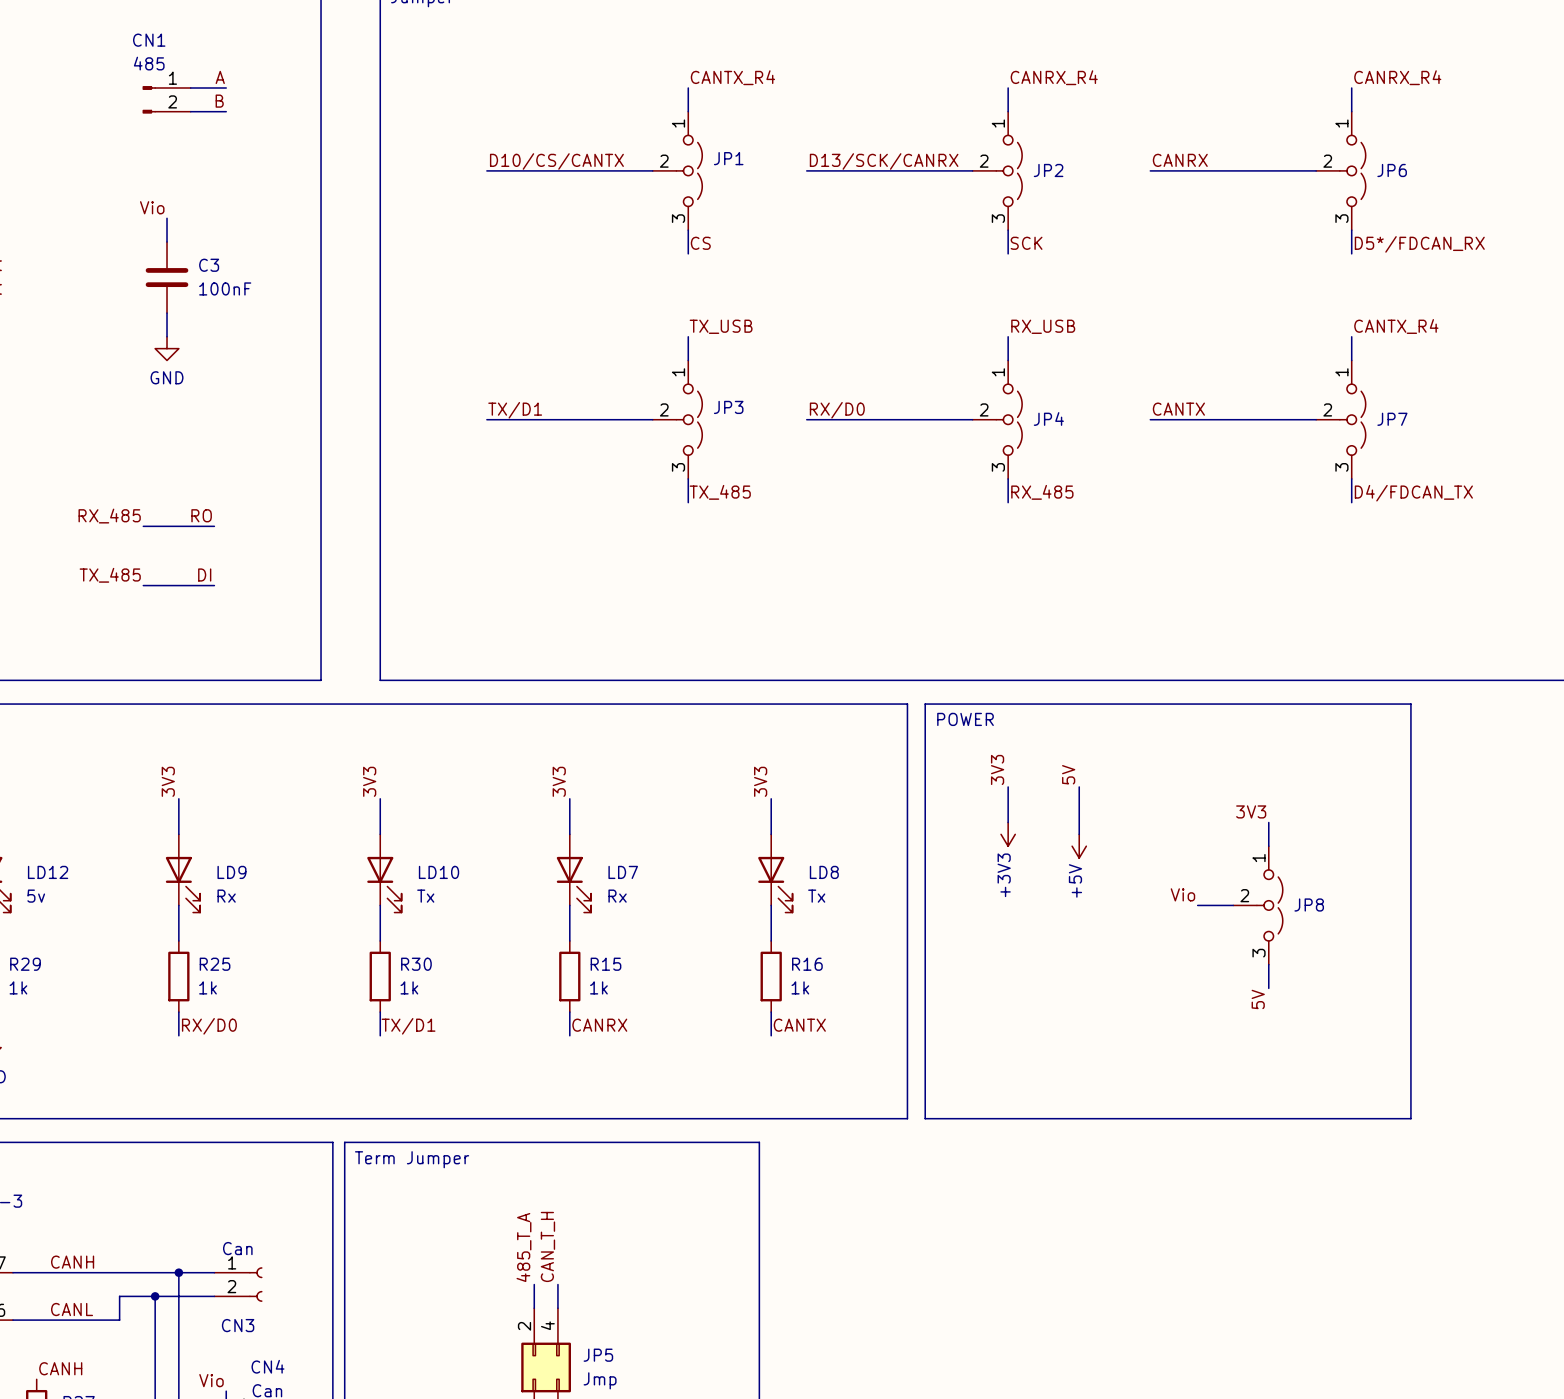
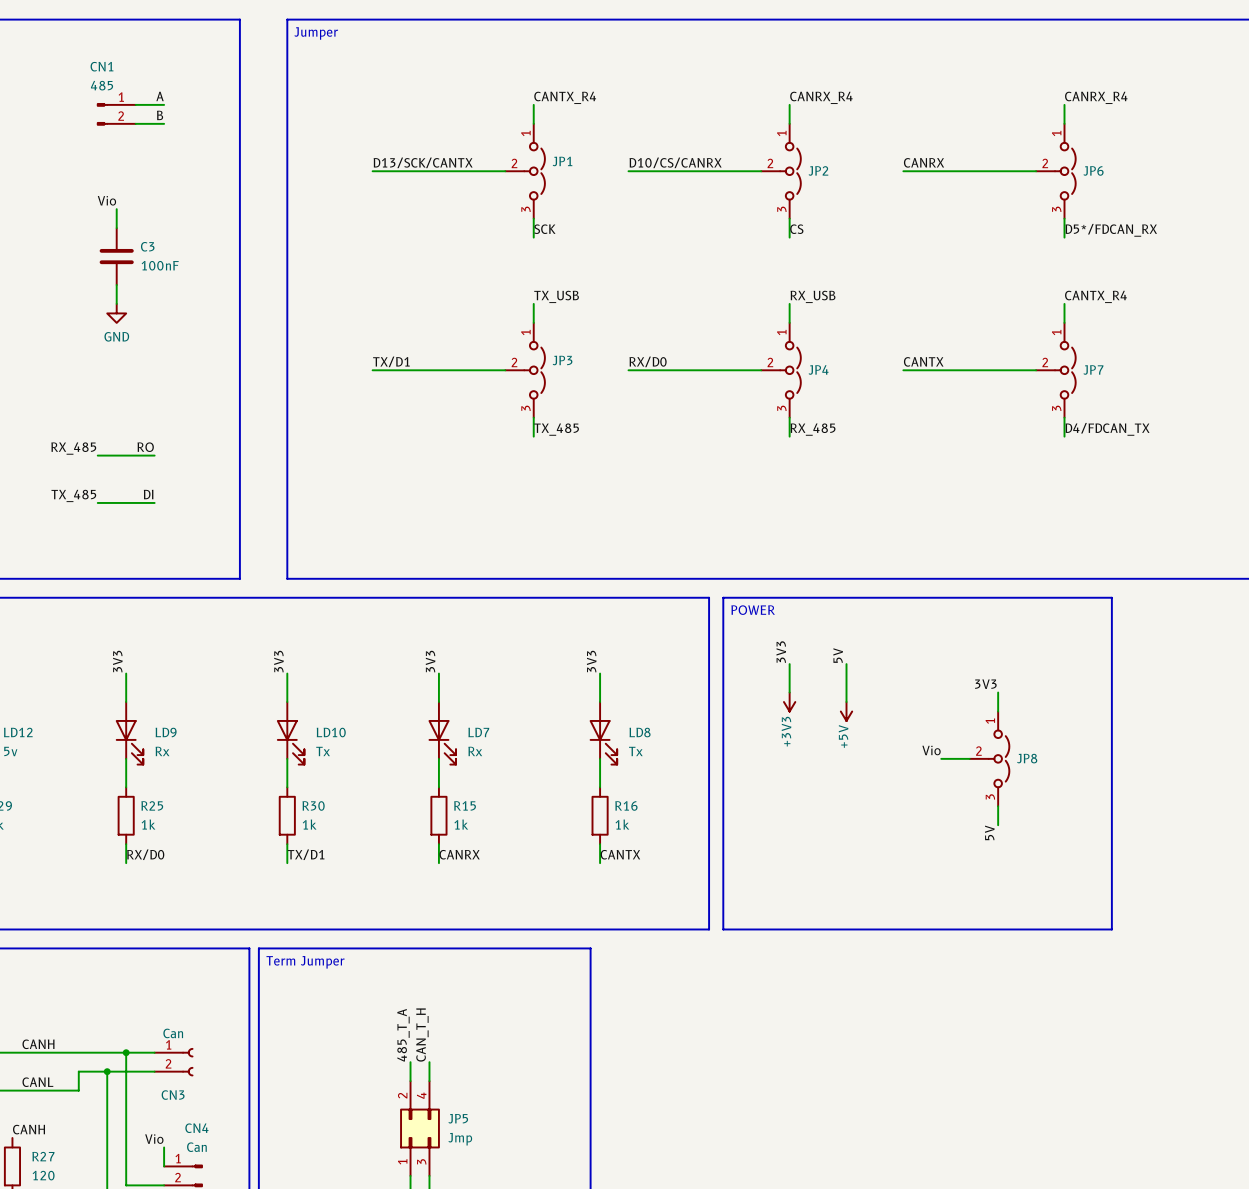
label: D10/CS/CANTX (556, 161) -> D13/SCK/CANTX (423, 162)
label: D13/SCK/CANRX (884, 161) -> D10/CS/CANRX (675, 162)
label: CS (700, 243) -> SCK (544, 229)
label: SCK (1026, 243) -> CS (796, 229)

